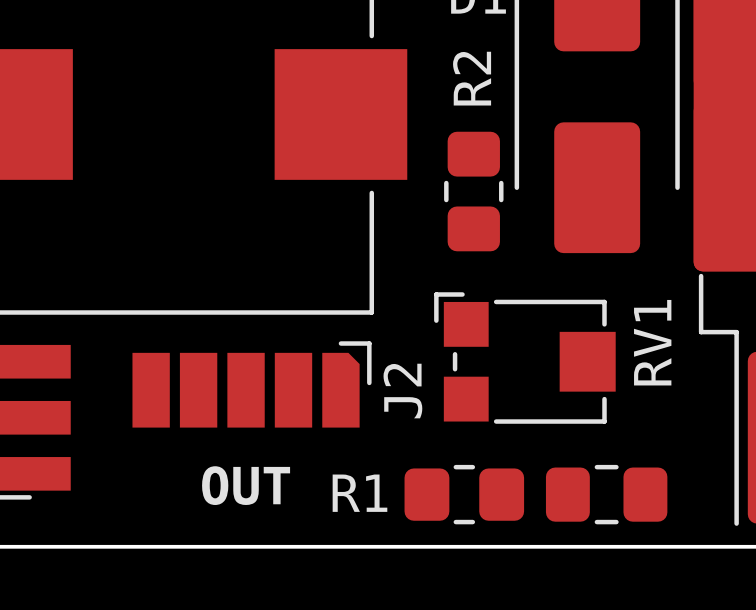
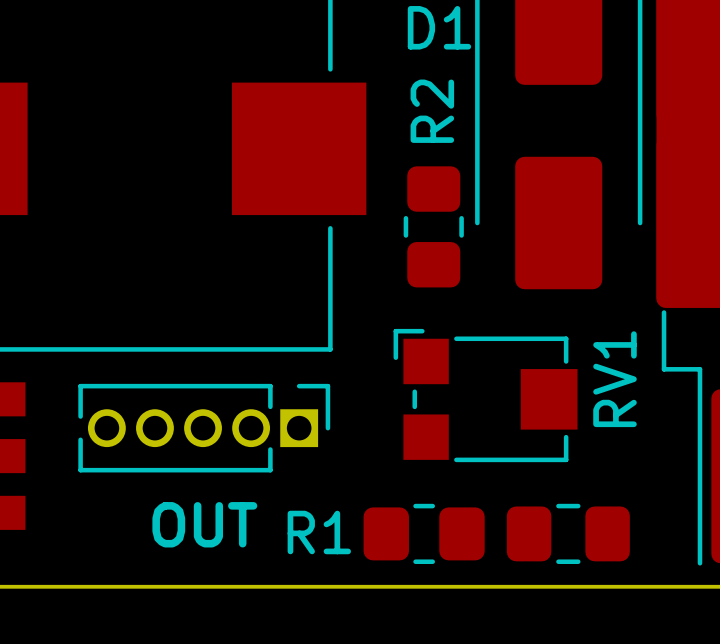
J2: (252, 384) -> none
part: none -> (204, 428)

